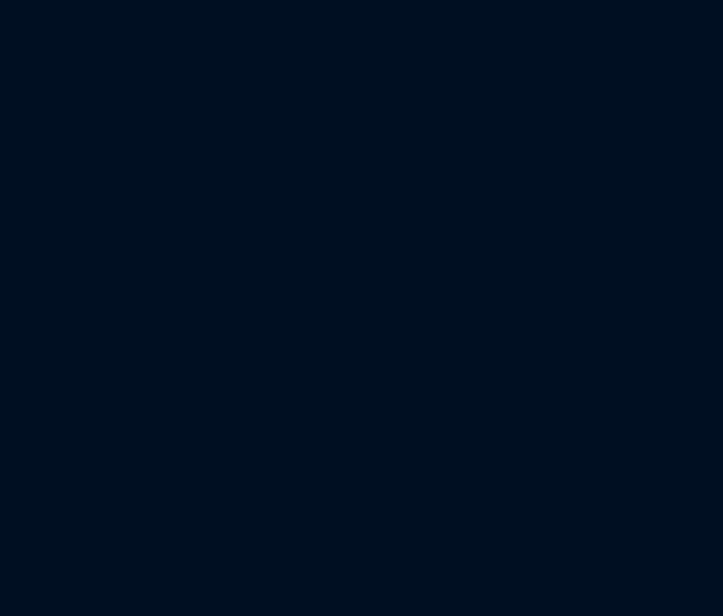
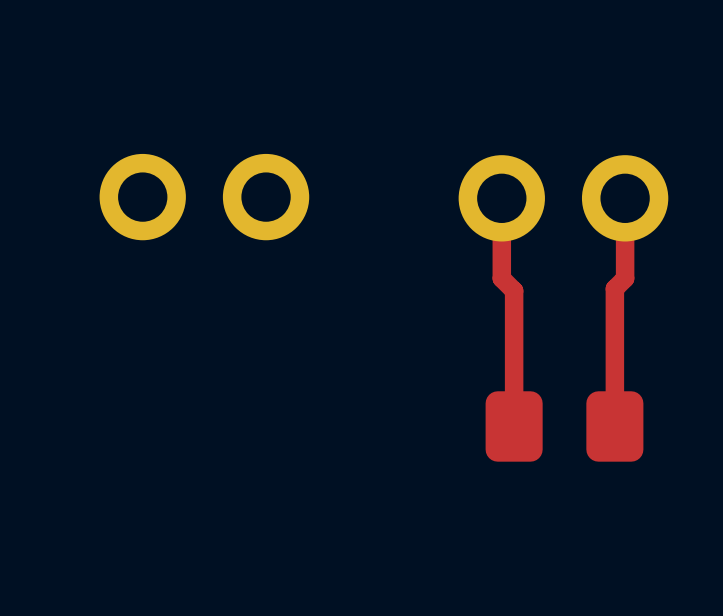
part: none -> (204, 197)
top track: none -> (501, 198) (501, 278) (514, 290) (514, 426)
part: none -> (563, 198)
top track: none -> (612, 210) (625, 198) (625, 278) (614, 288) (614, 426) (612, 424)
part: none -> (564, 426)

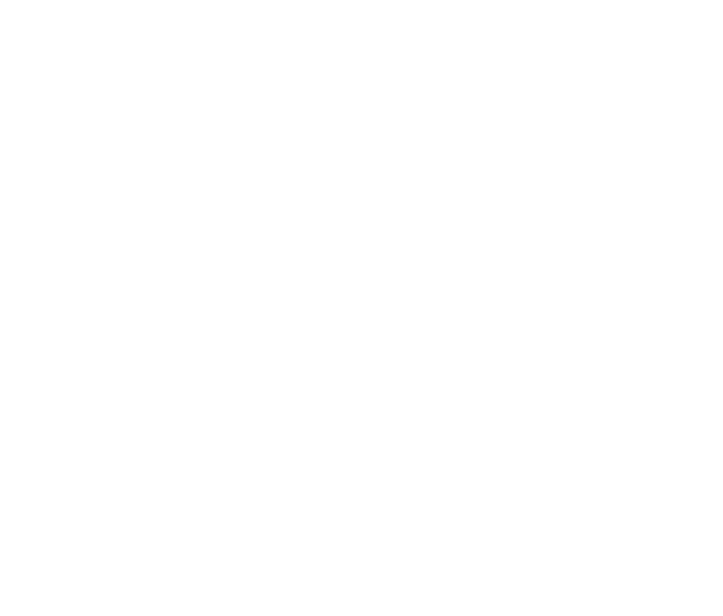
part: (204, 197) -> none
top track: (501, 198) (501, 278) (514, 290) (514, 426) -> none
part: (563, 198) -> none
top track: (612, 210) (625, 198) (625, 278) (614, 288) (614, 426) (612, 424) -> none
part: (564, 426) -> none

